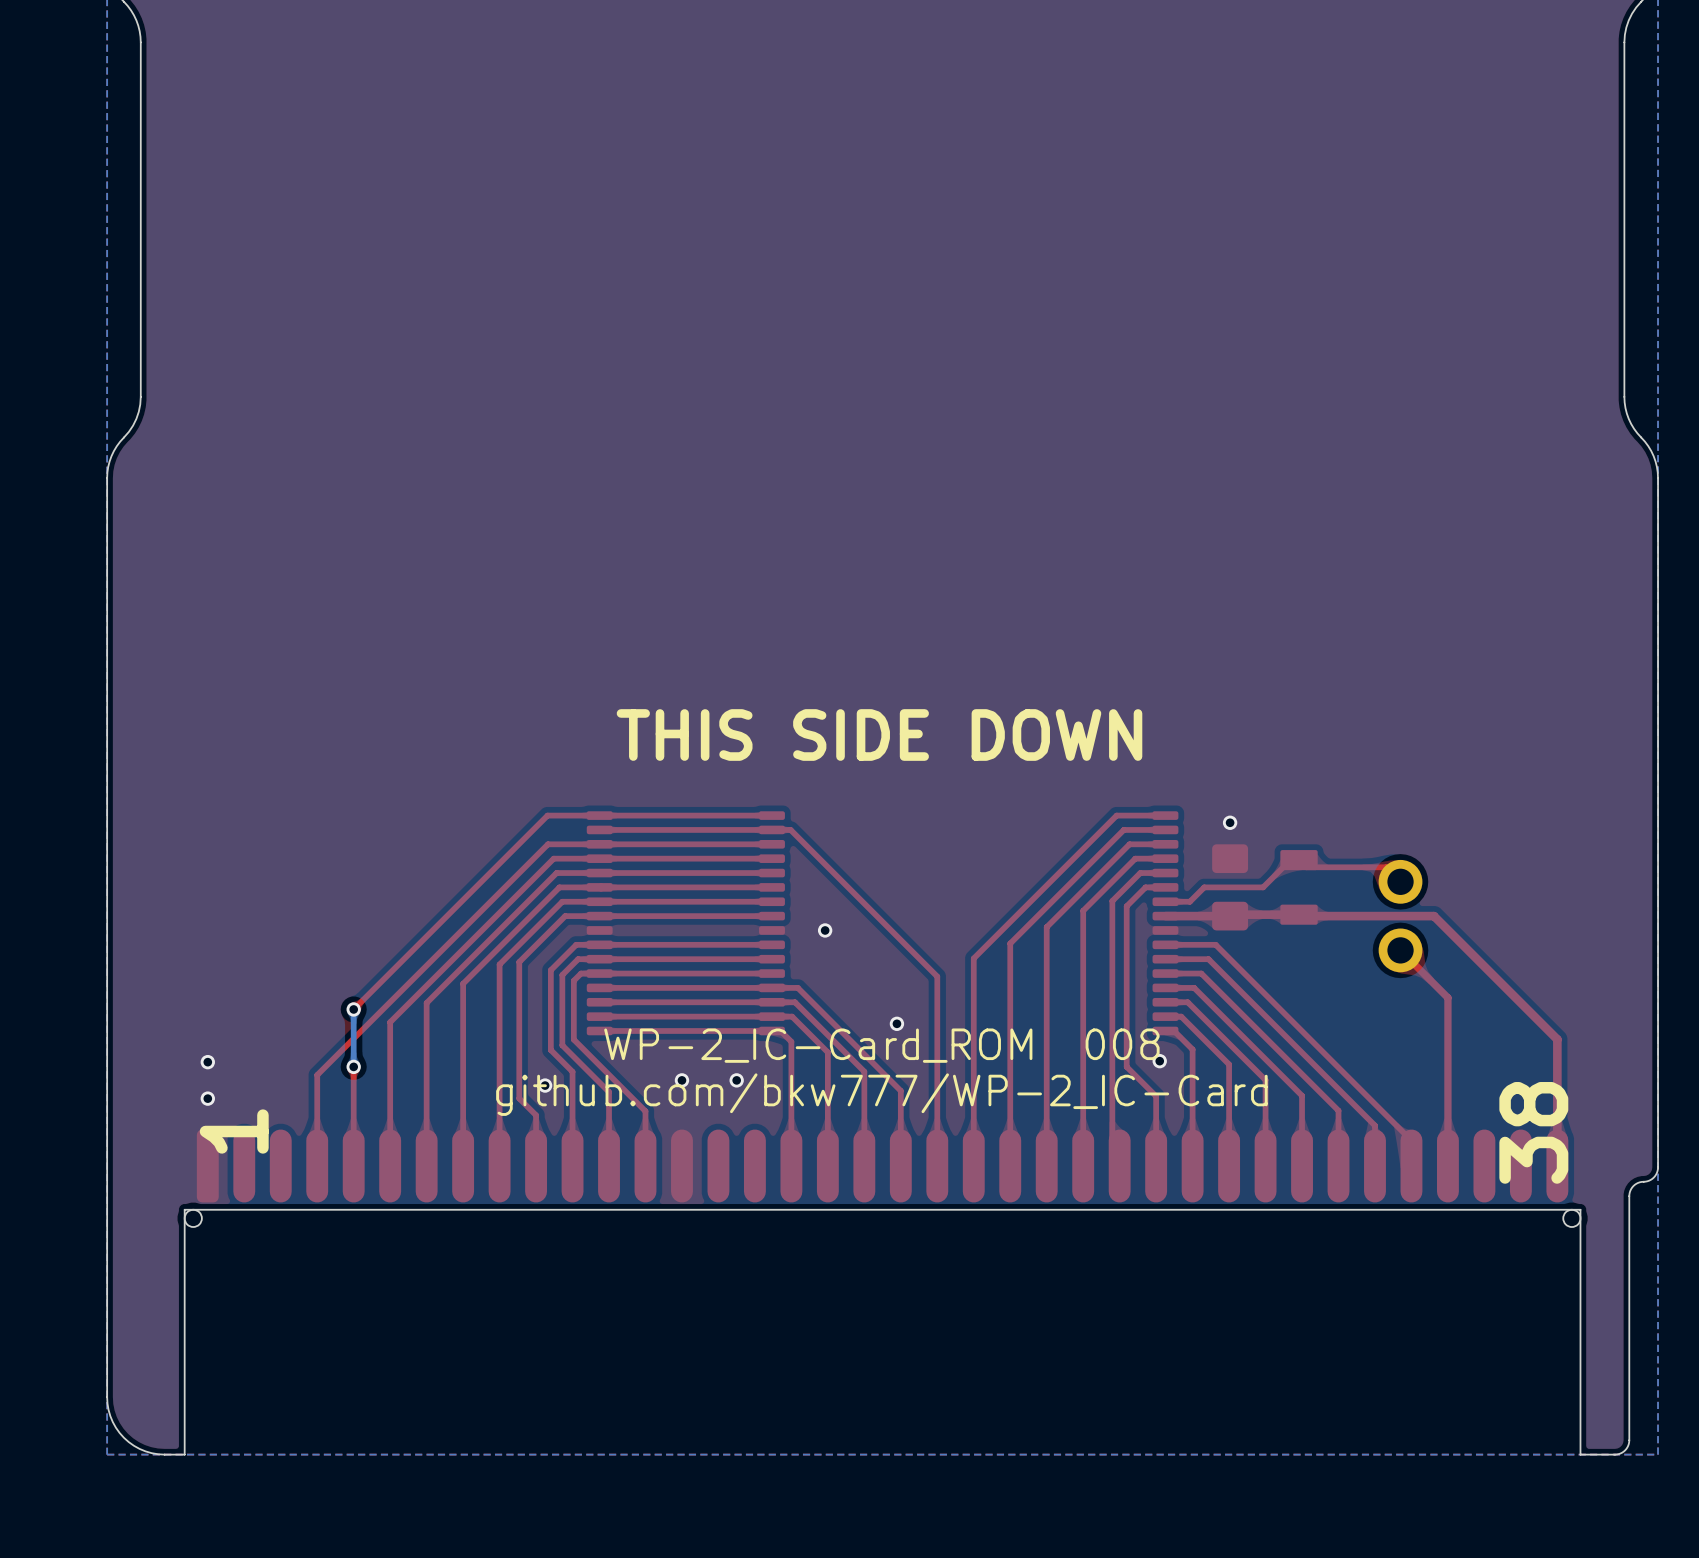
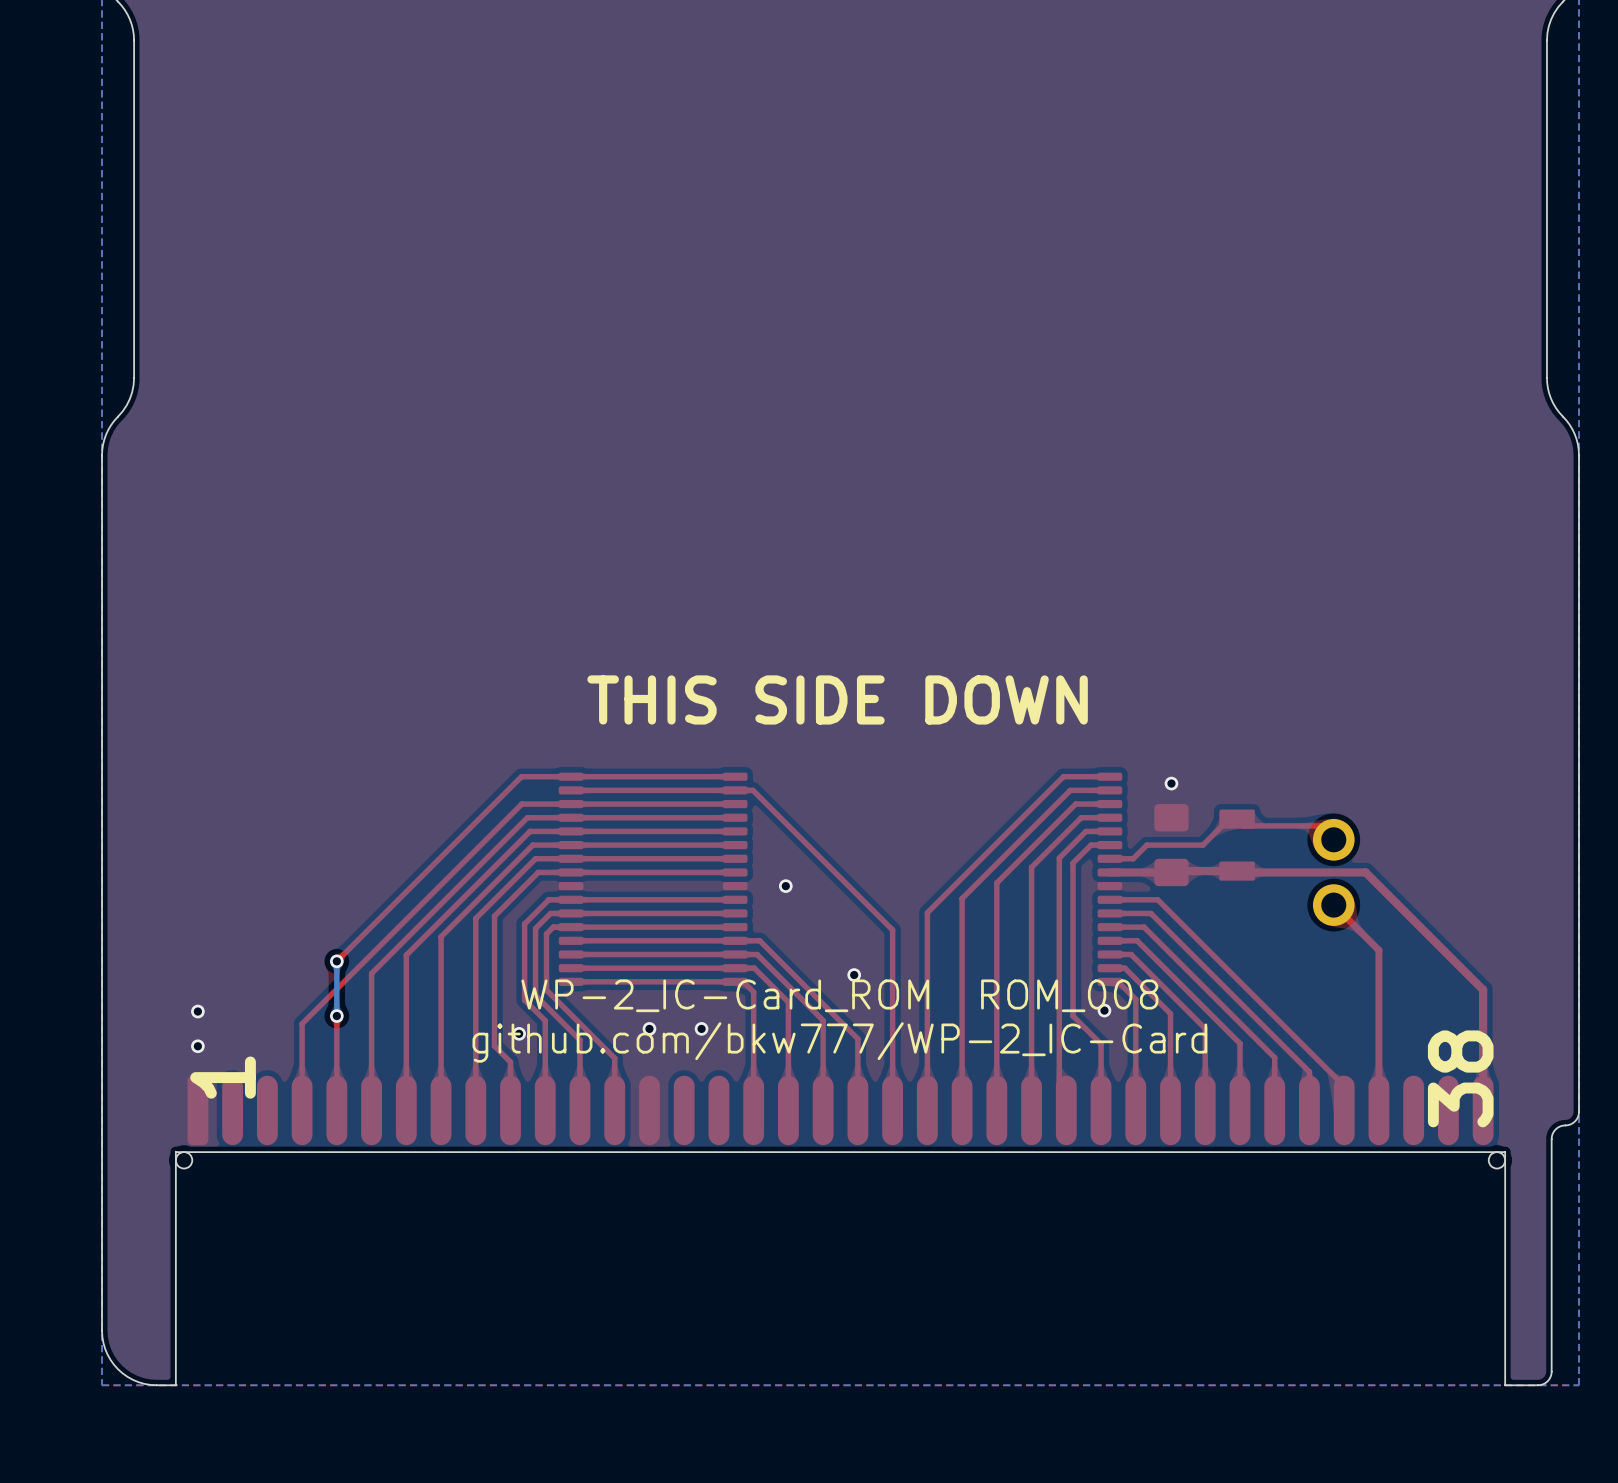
text: WP-2_IC-Card_ROM 008 (881, 1045) -> WP-2_IC-Card_ROM ROM_008 (839, 995)

